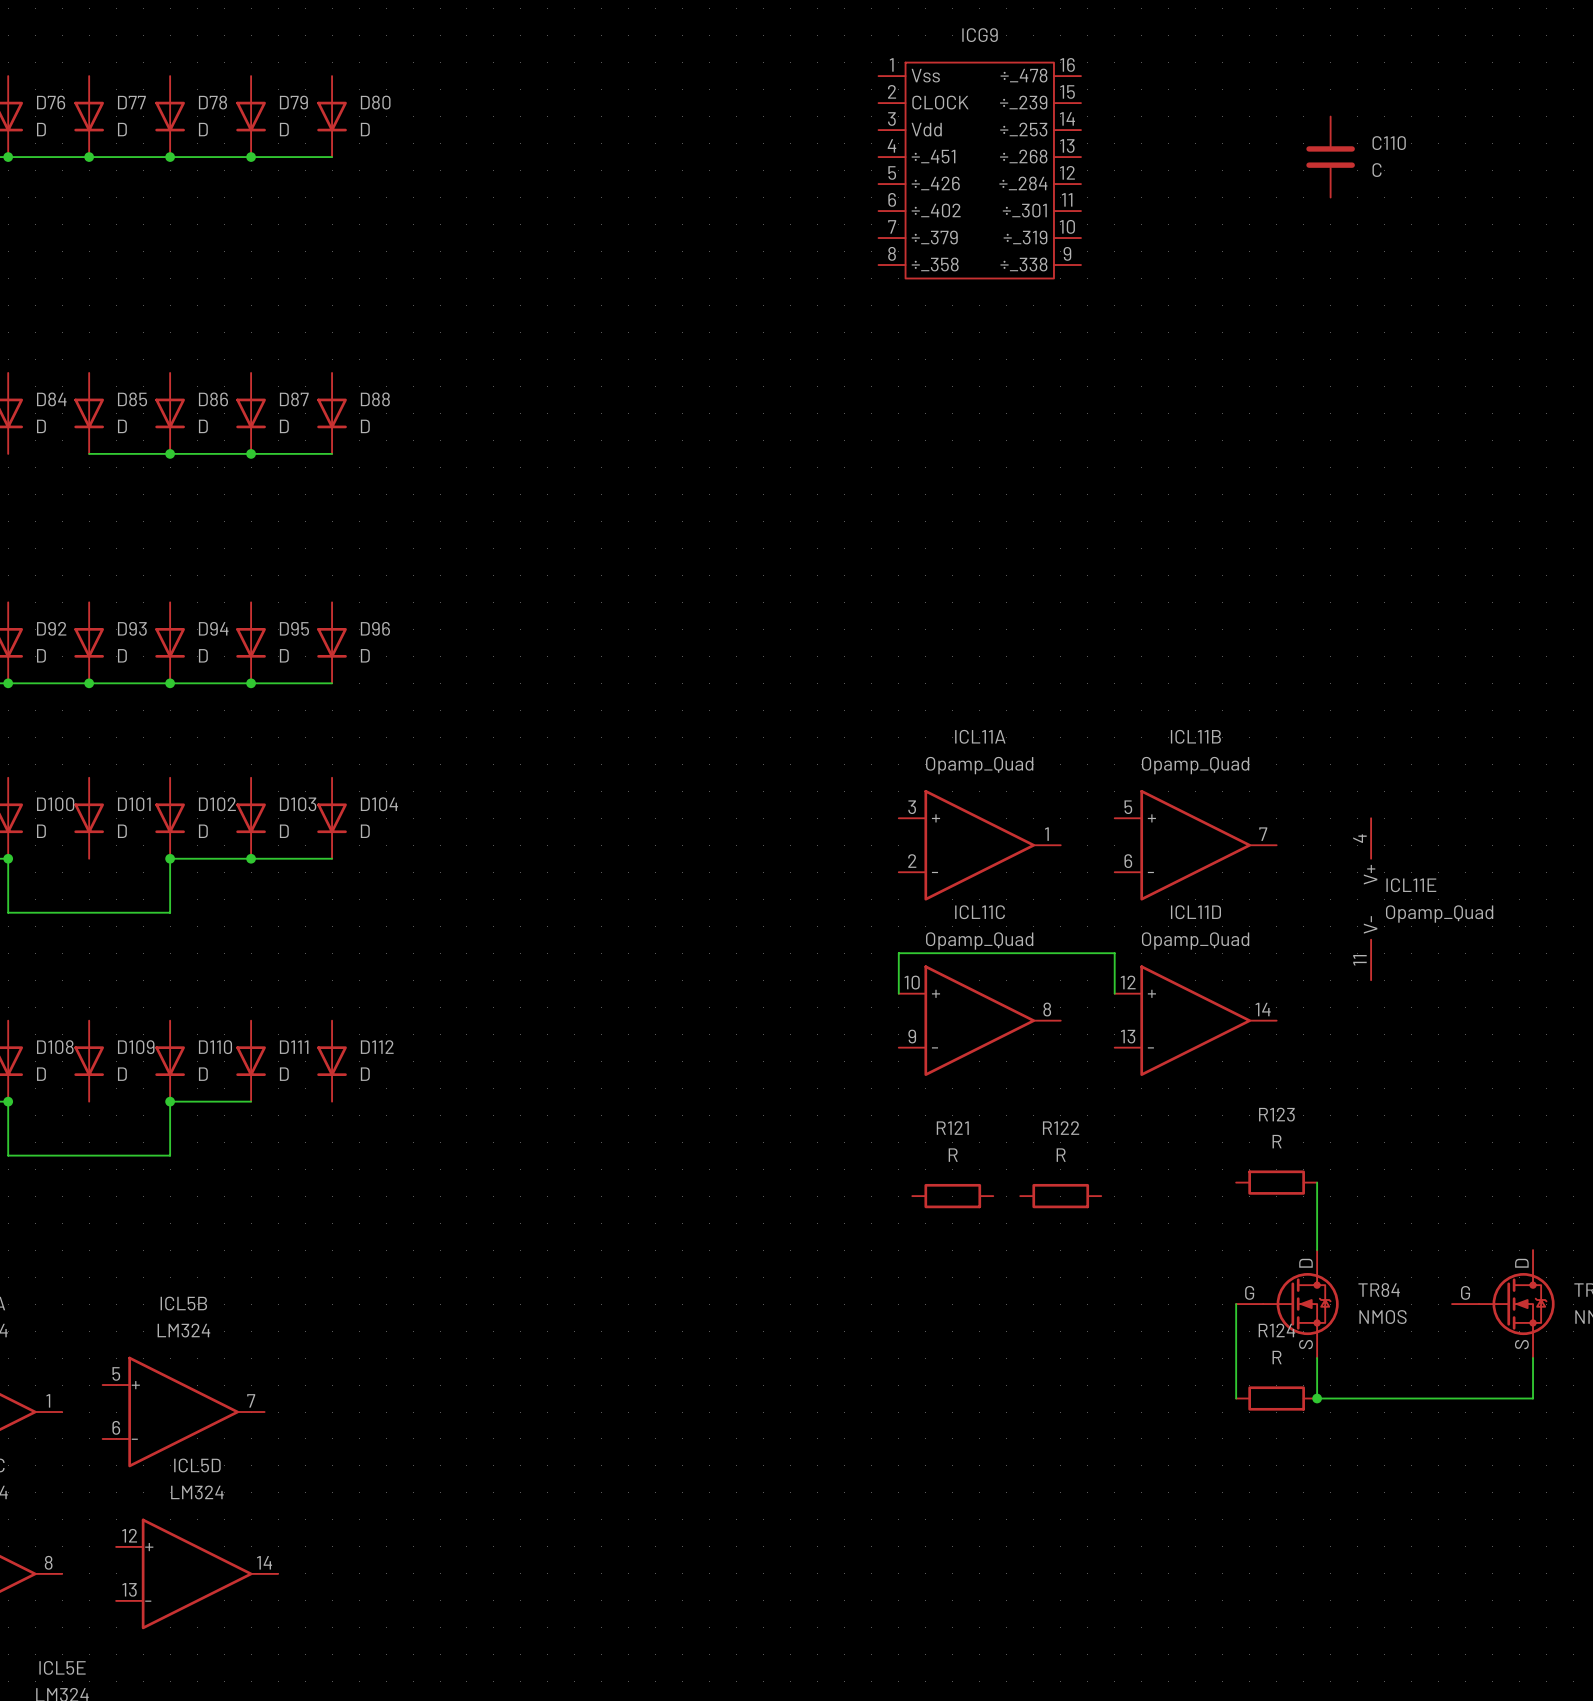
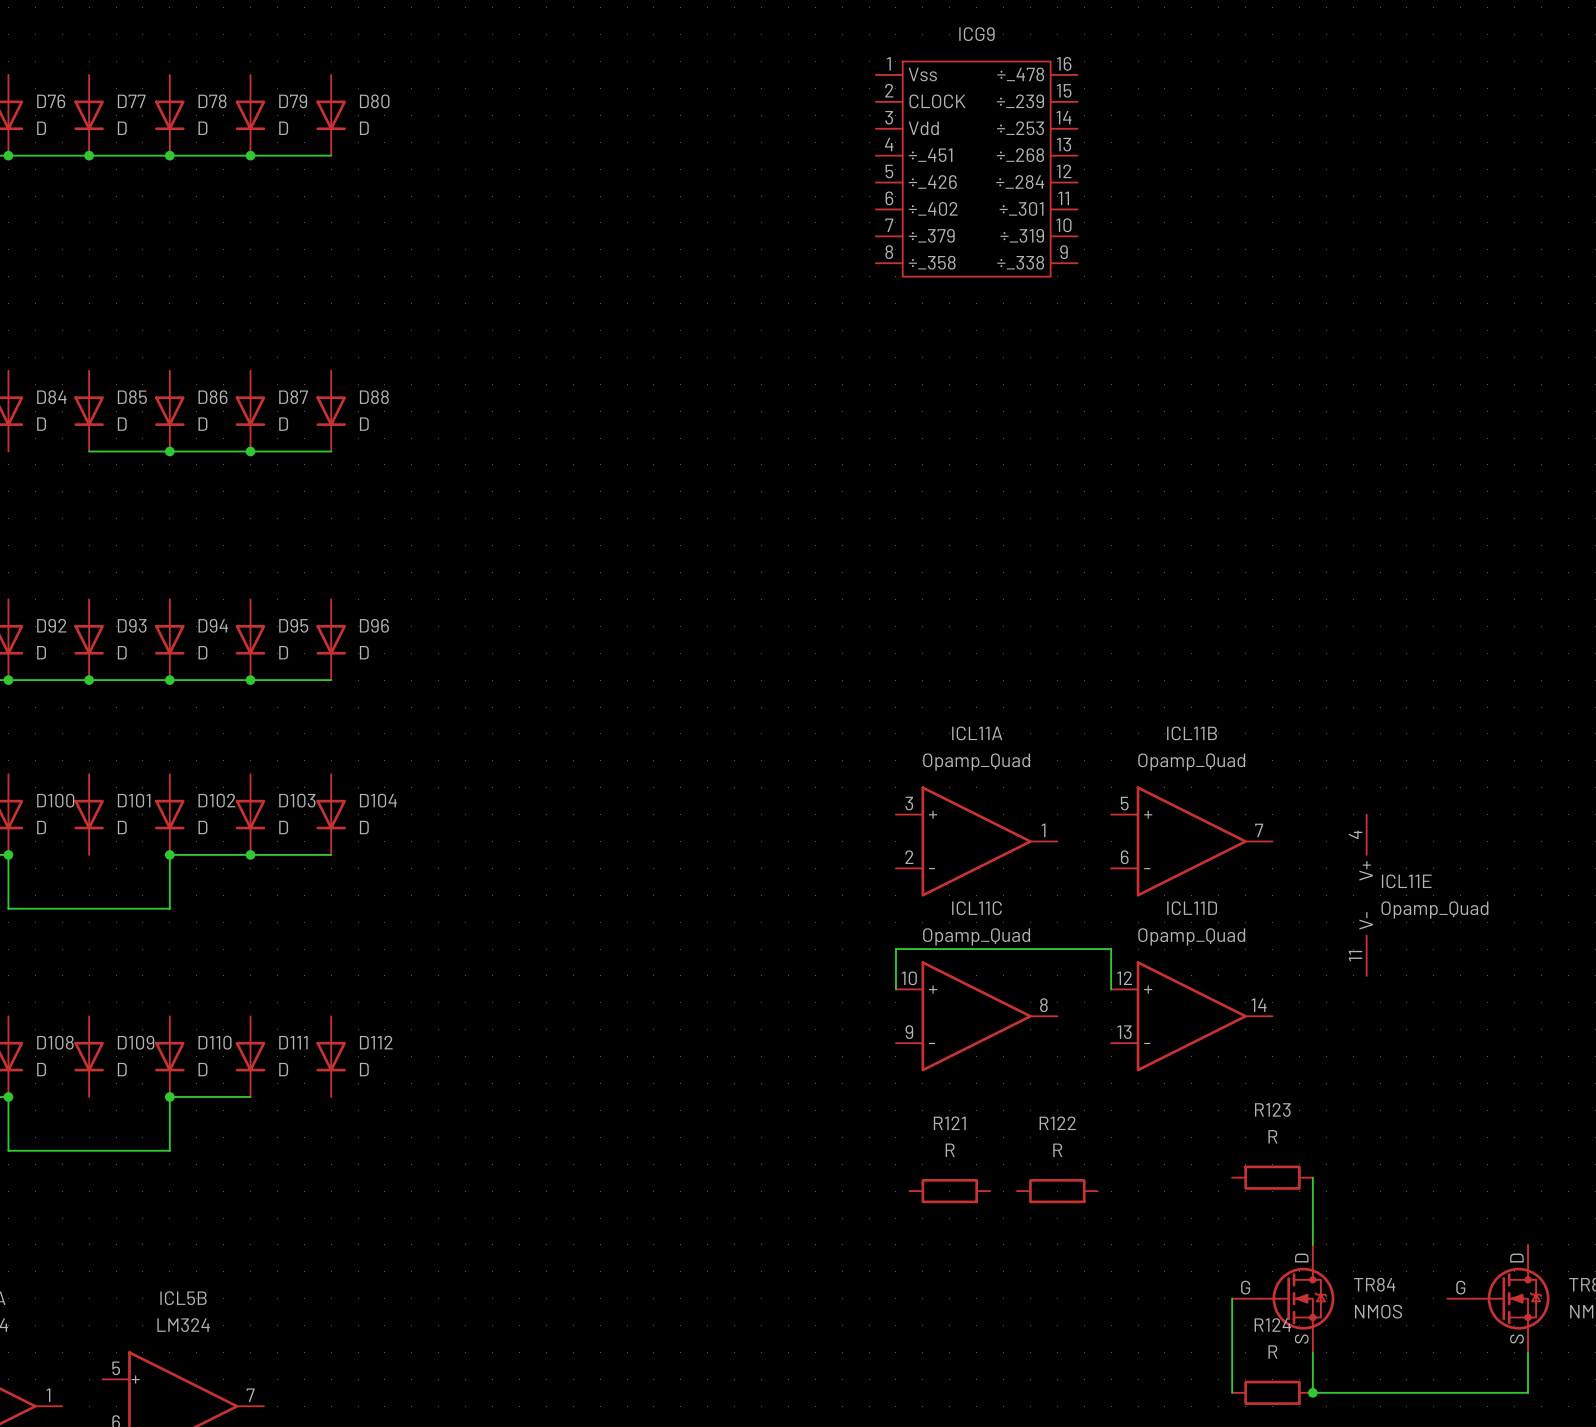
C110: C (1330, 157) -> none

